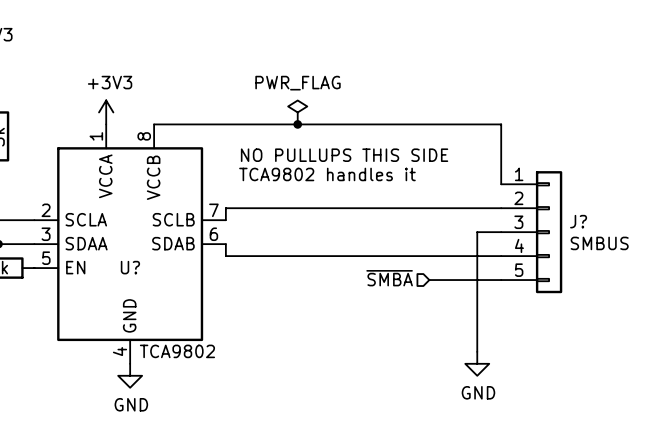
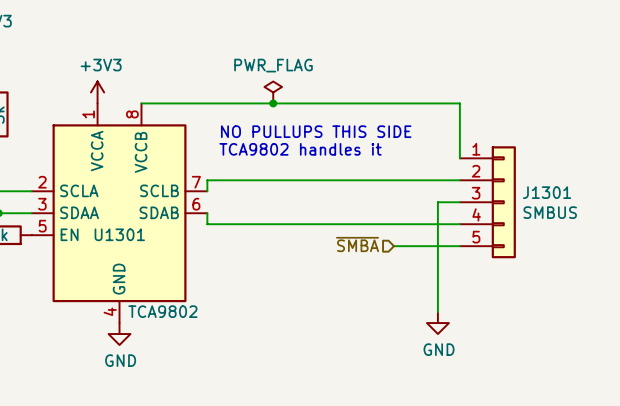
J? name: J? (578, 221) -> J1301 (547, 192)
U? name: U? (130, 267) -> U1301 (119, 234)

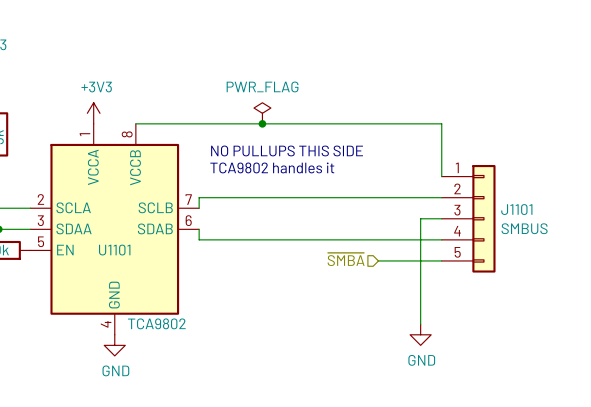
J1301 name: J1301 (547, 192) -> J1101 (516, 209)
U1301 name: U1301 (119, 234) -> U1101 (114, 250)

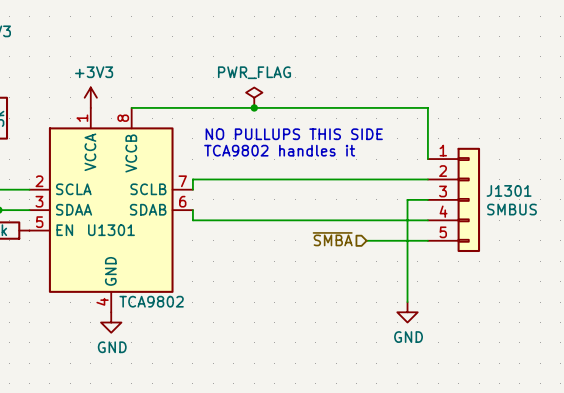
J1101 name: J1101 (516, 209) -> J1301 (509, 190)
U1101 name: U1101 (114, 250) -> U1301 (111, 230)

